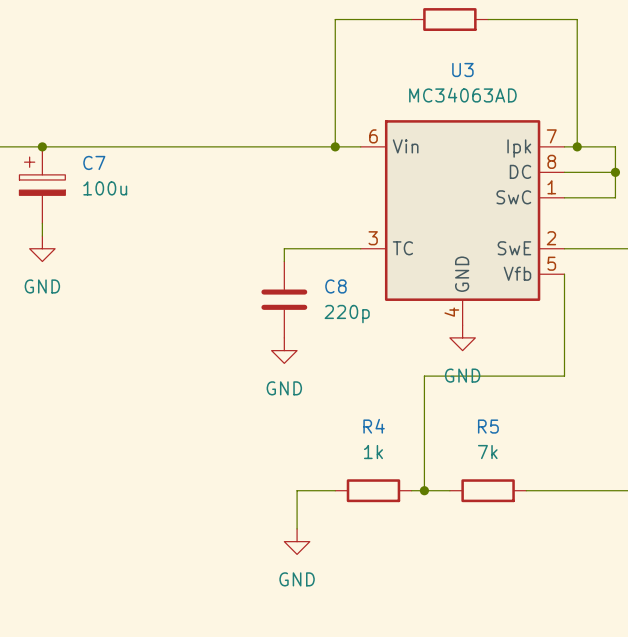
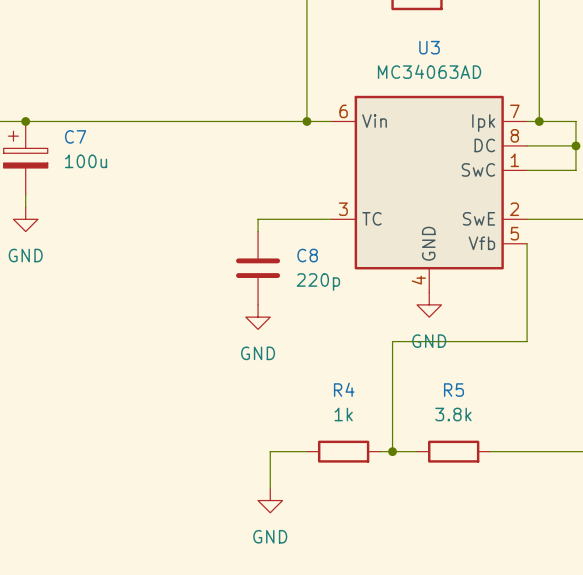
R5 value: 7k (487, 452) -> 3.8k (453, 414)

